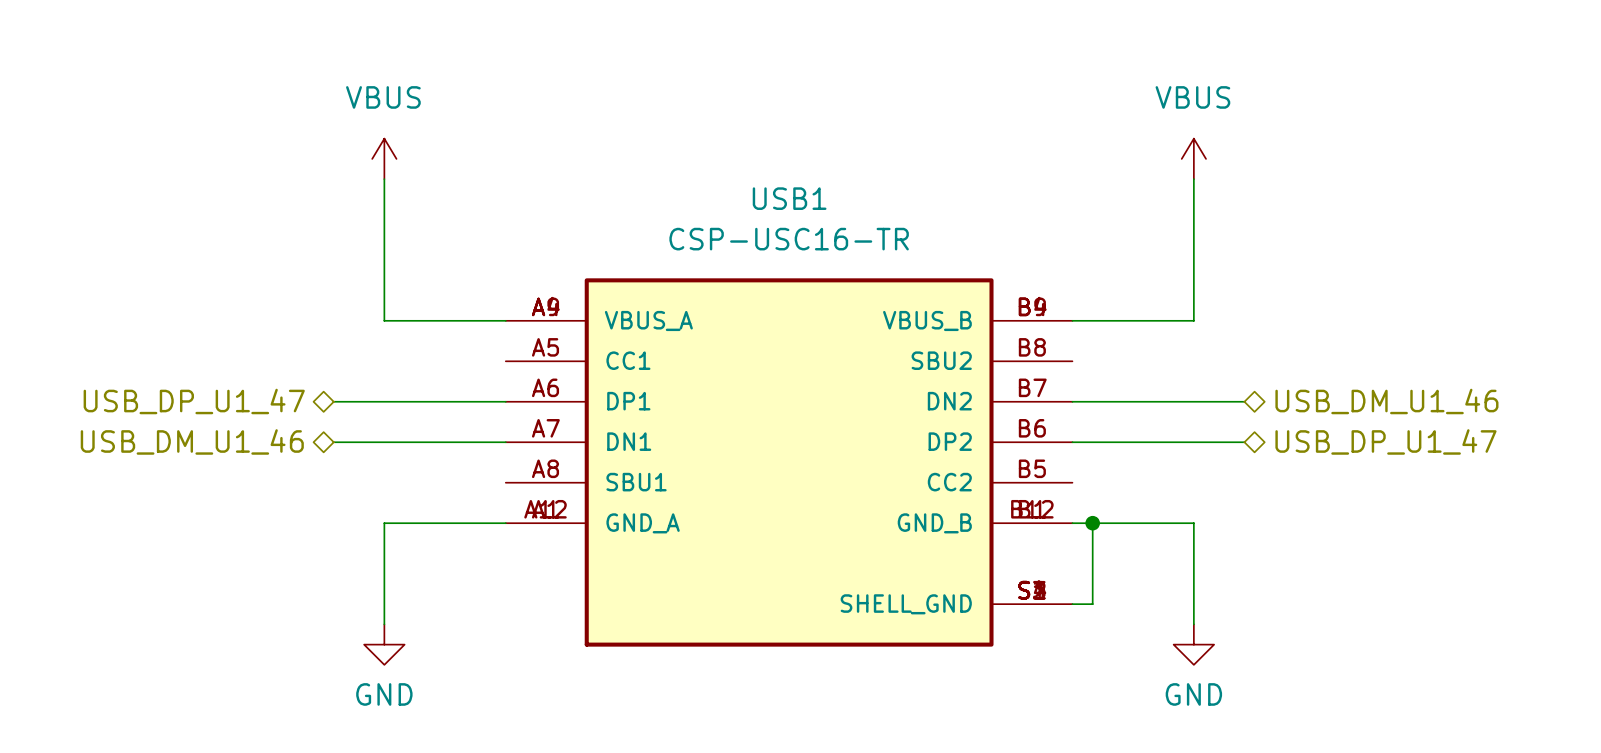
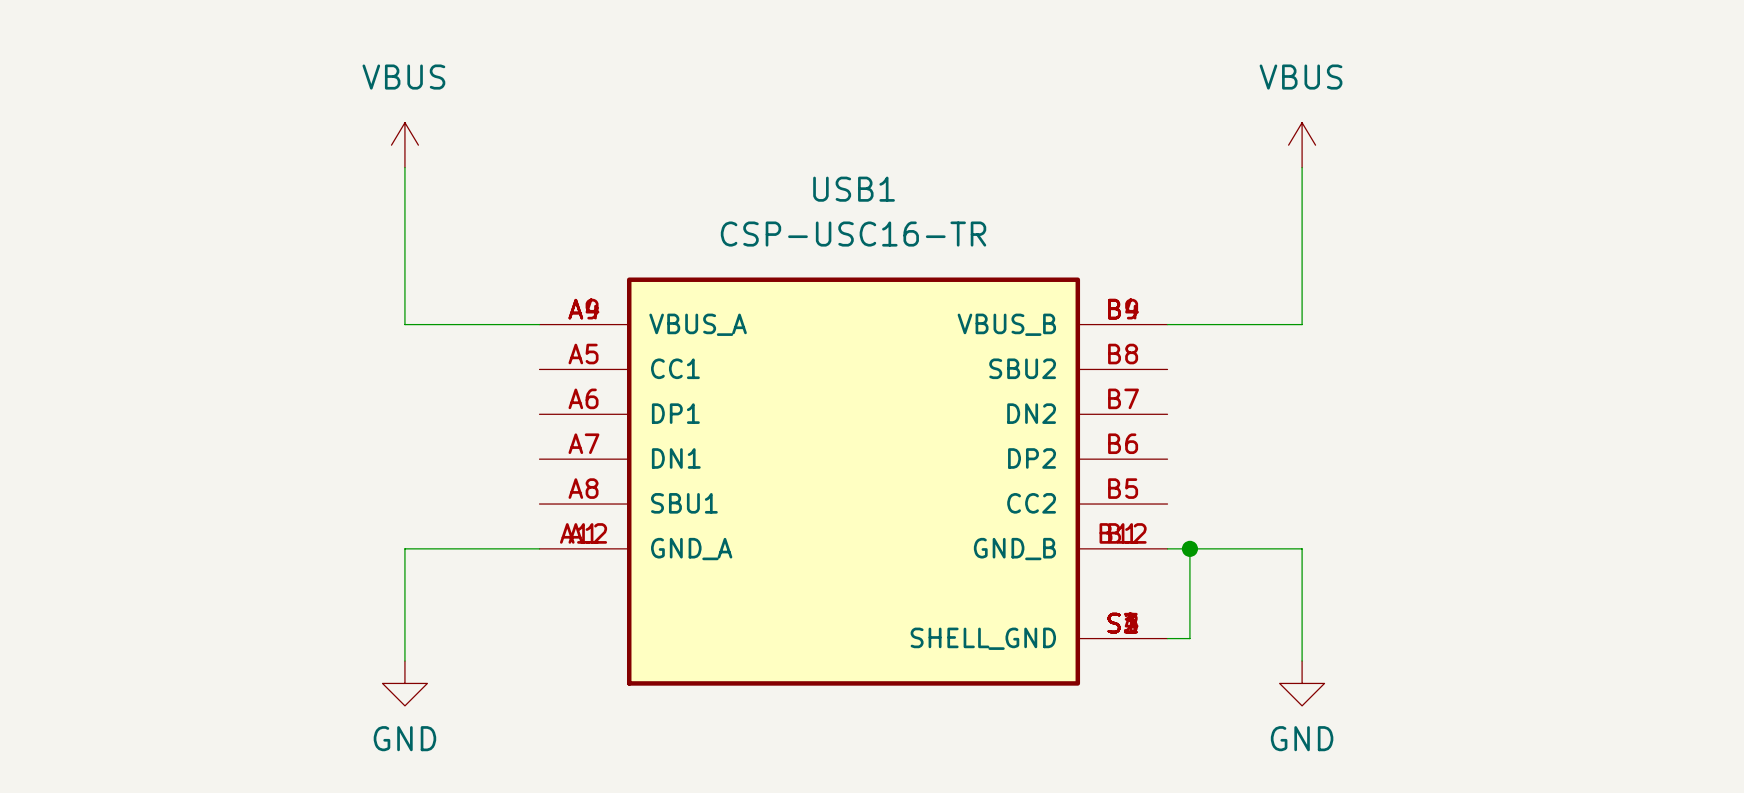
hierarchical label: USB_DP_U1_47 (194, 401) -> none
wire: (333, 401) (505, 401) -> none
wire: (1072, 401) (1244, 401) -> none
hierarchical label: USB_DM_U1_46 (1386, 401) -> none
hierarchical label: USB_DM_U1_46 (192, 441) -> none
hierarchical label: USB_DP_U1_47 (1385, 441) -> none
wire: (333, 442) (505, 442) -> none
wire: (1072, 442) (1244, 442) -> none

